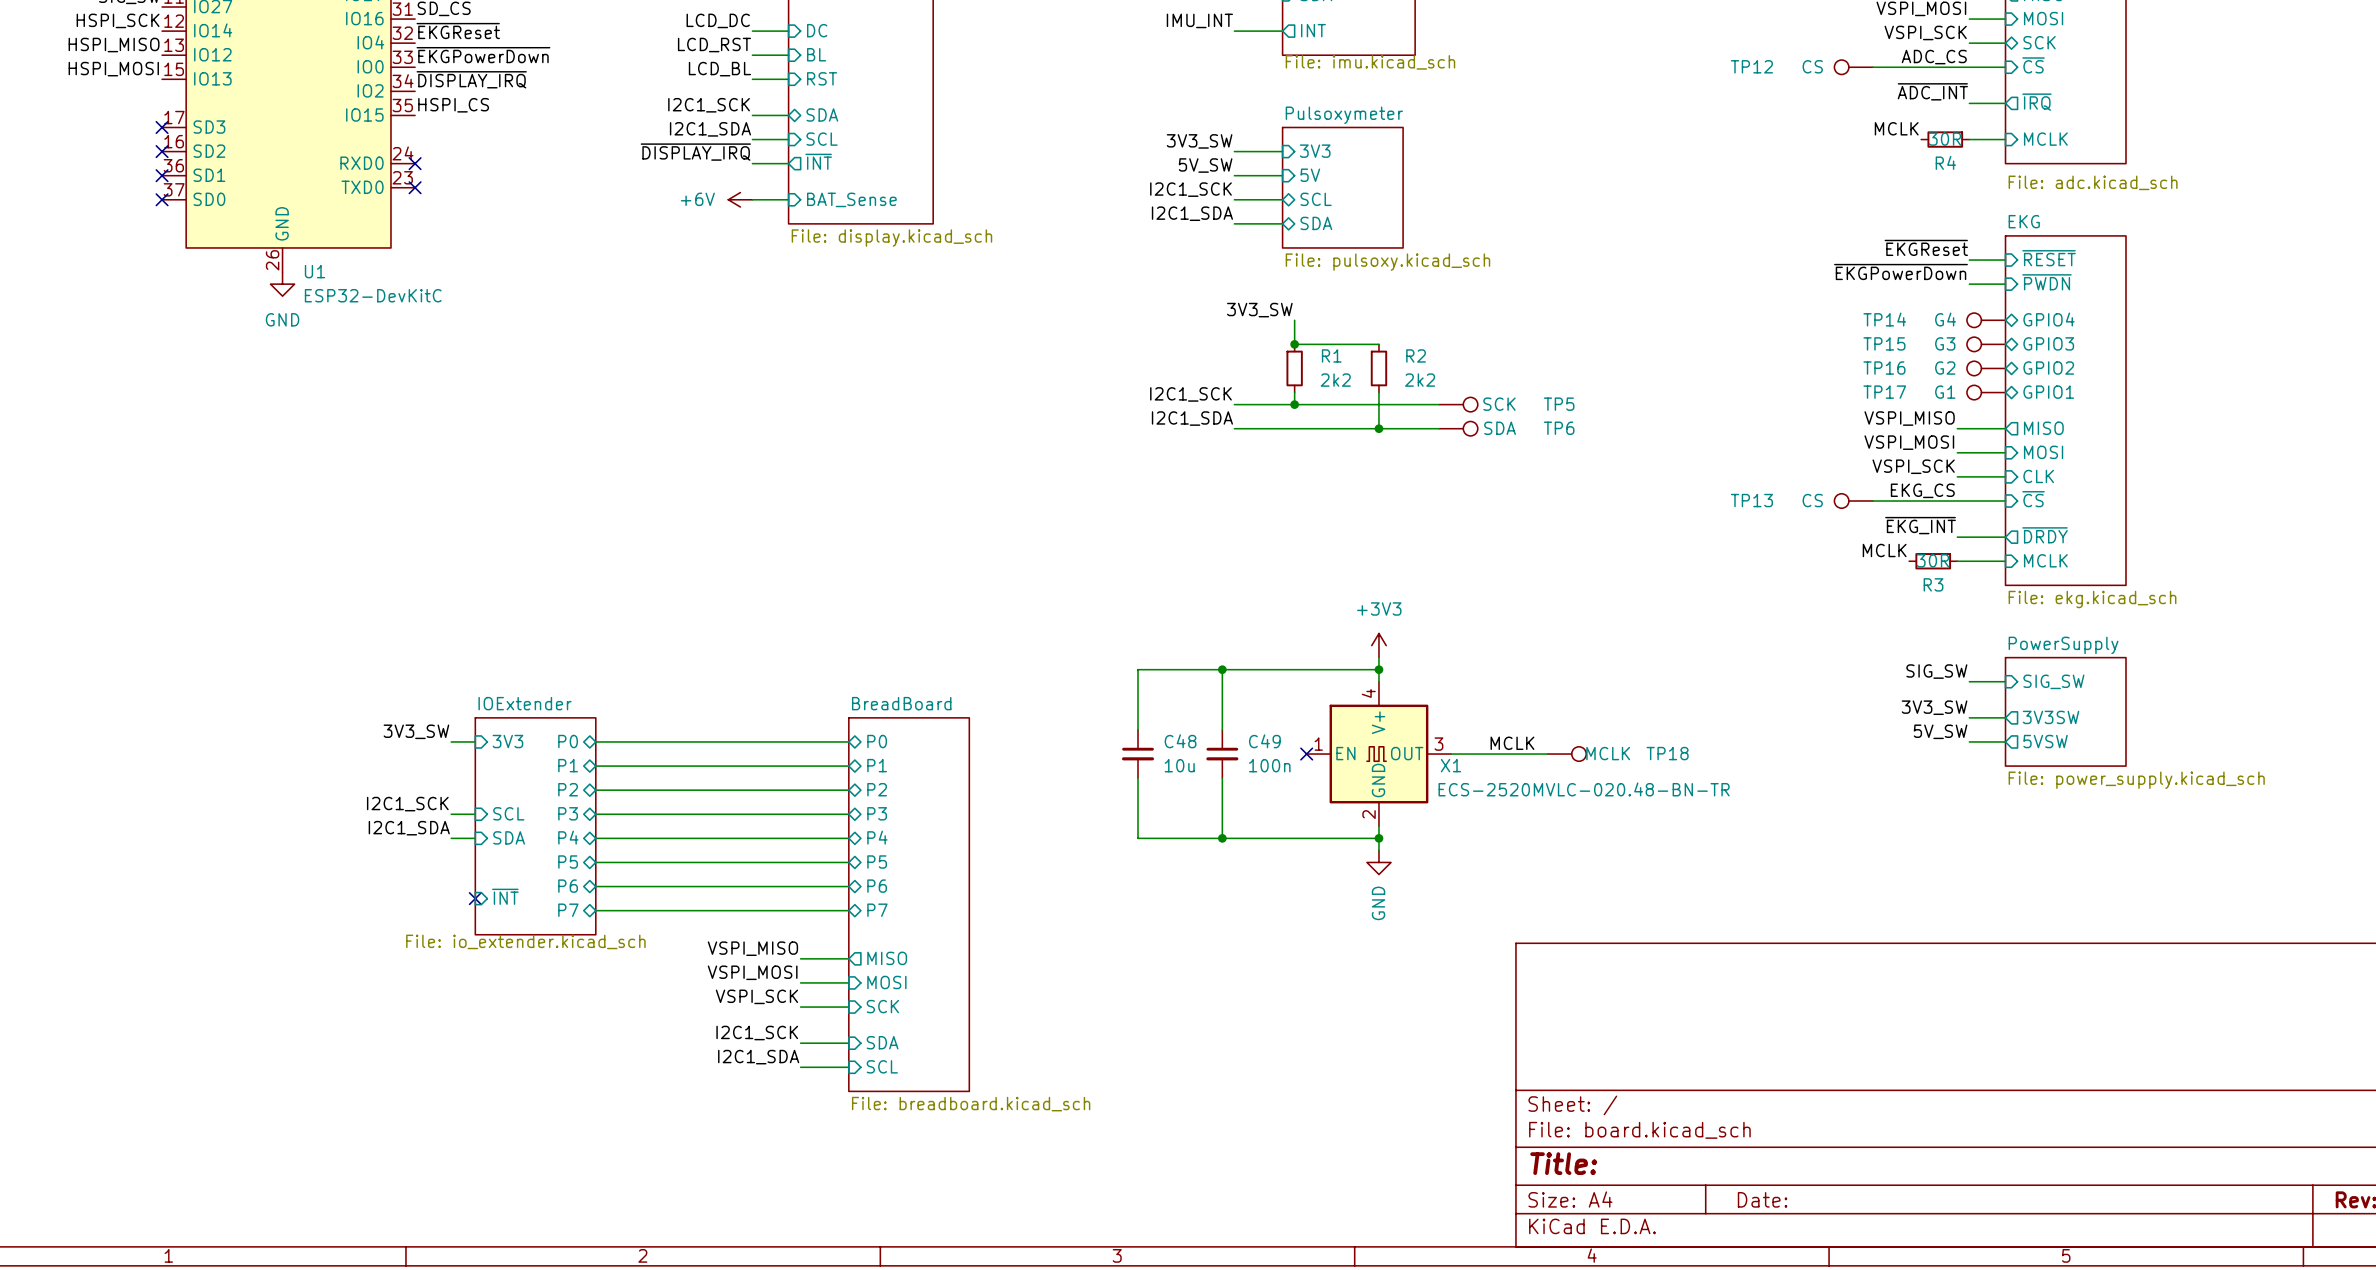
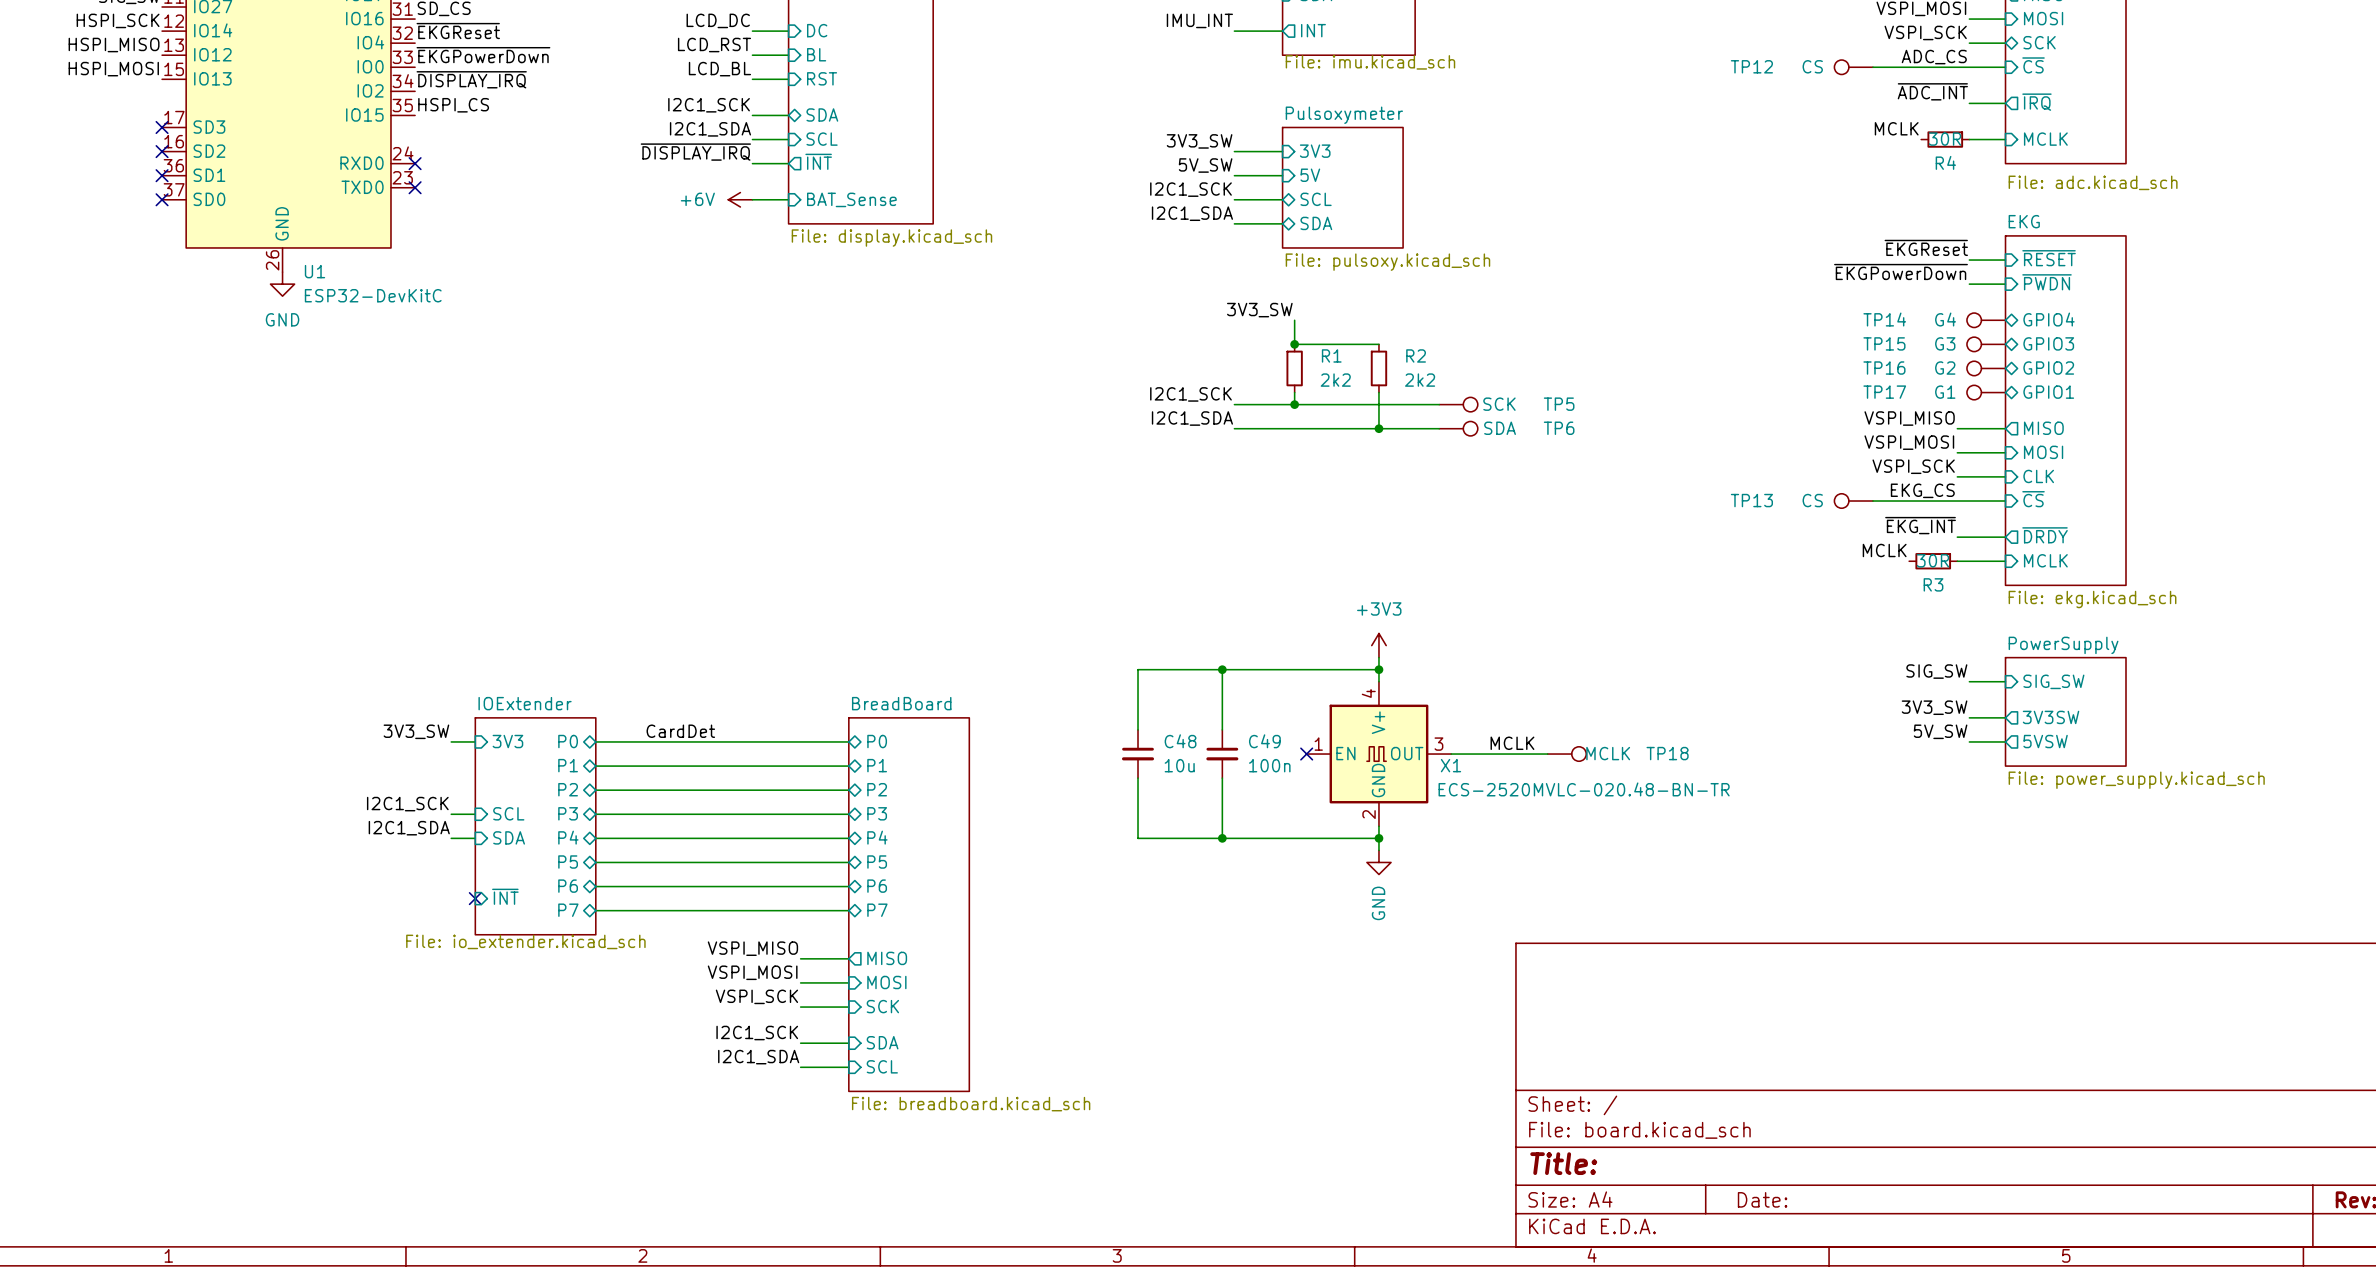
label: none -> CardDet (680, 731)

